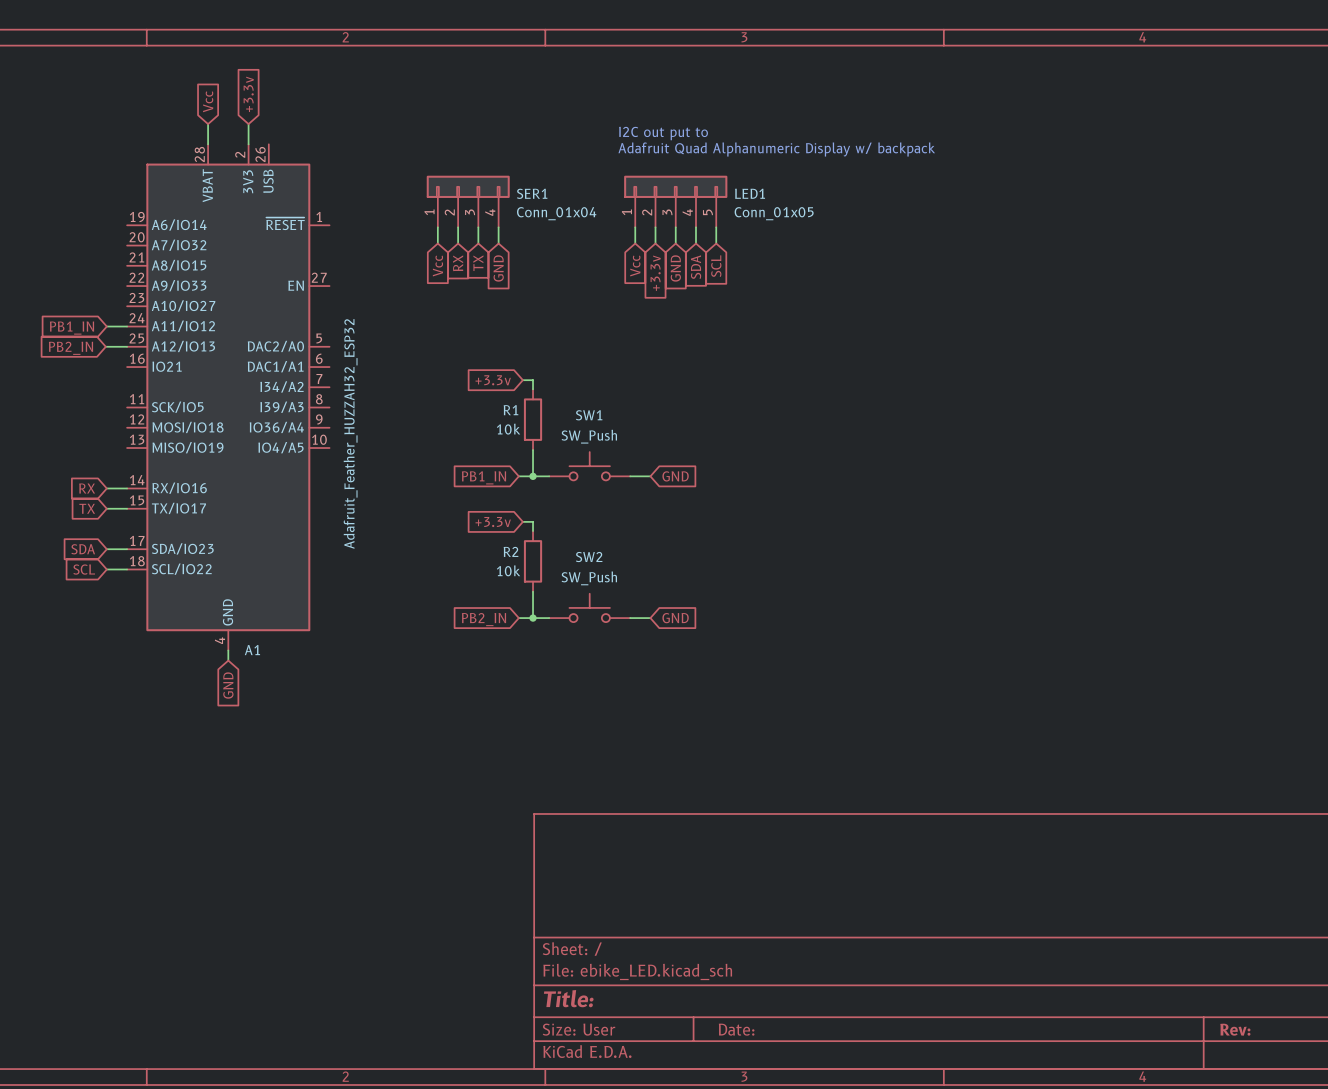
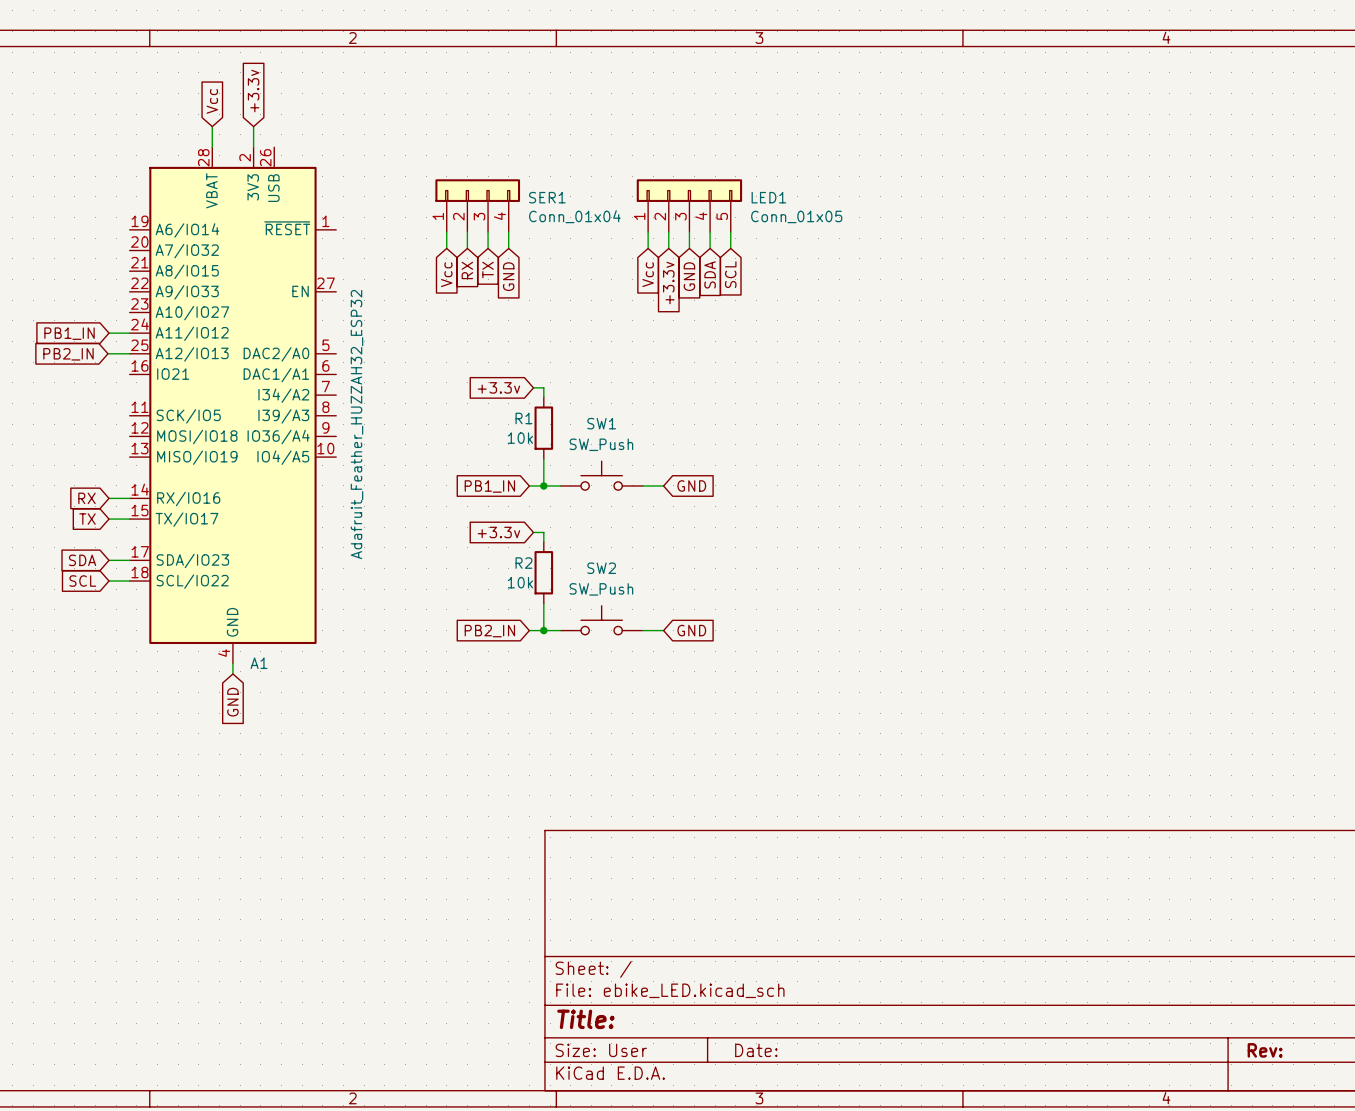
text: I2C out put to (663, 133) -> none
text: Adafruit Quad Alphanumeric Display w/ backpack (776, 149) -> none

